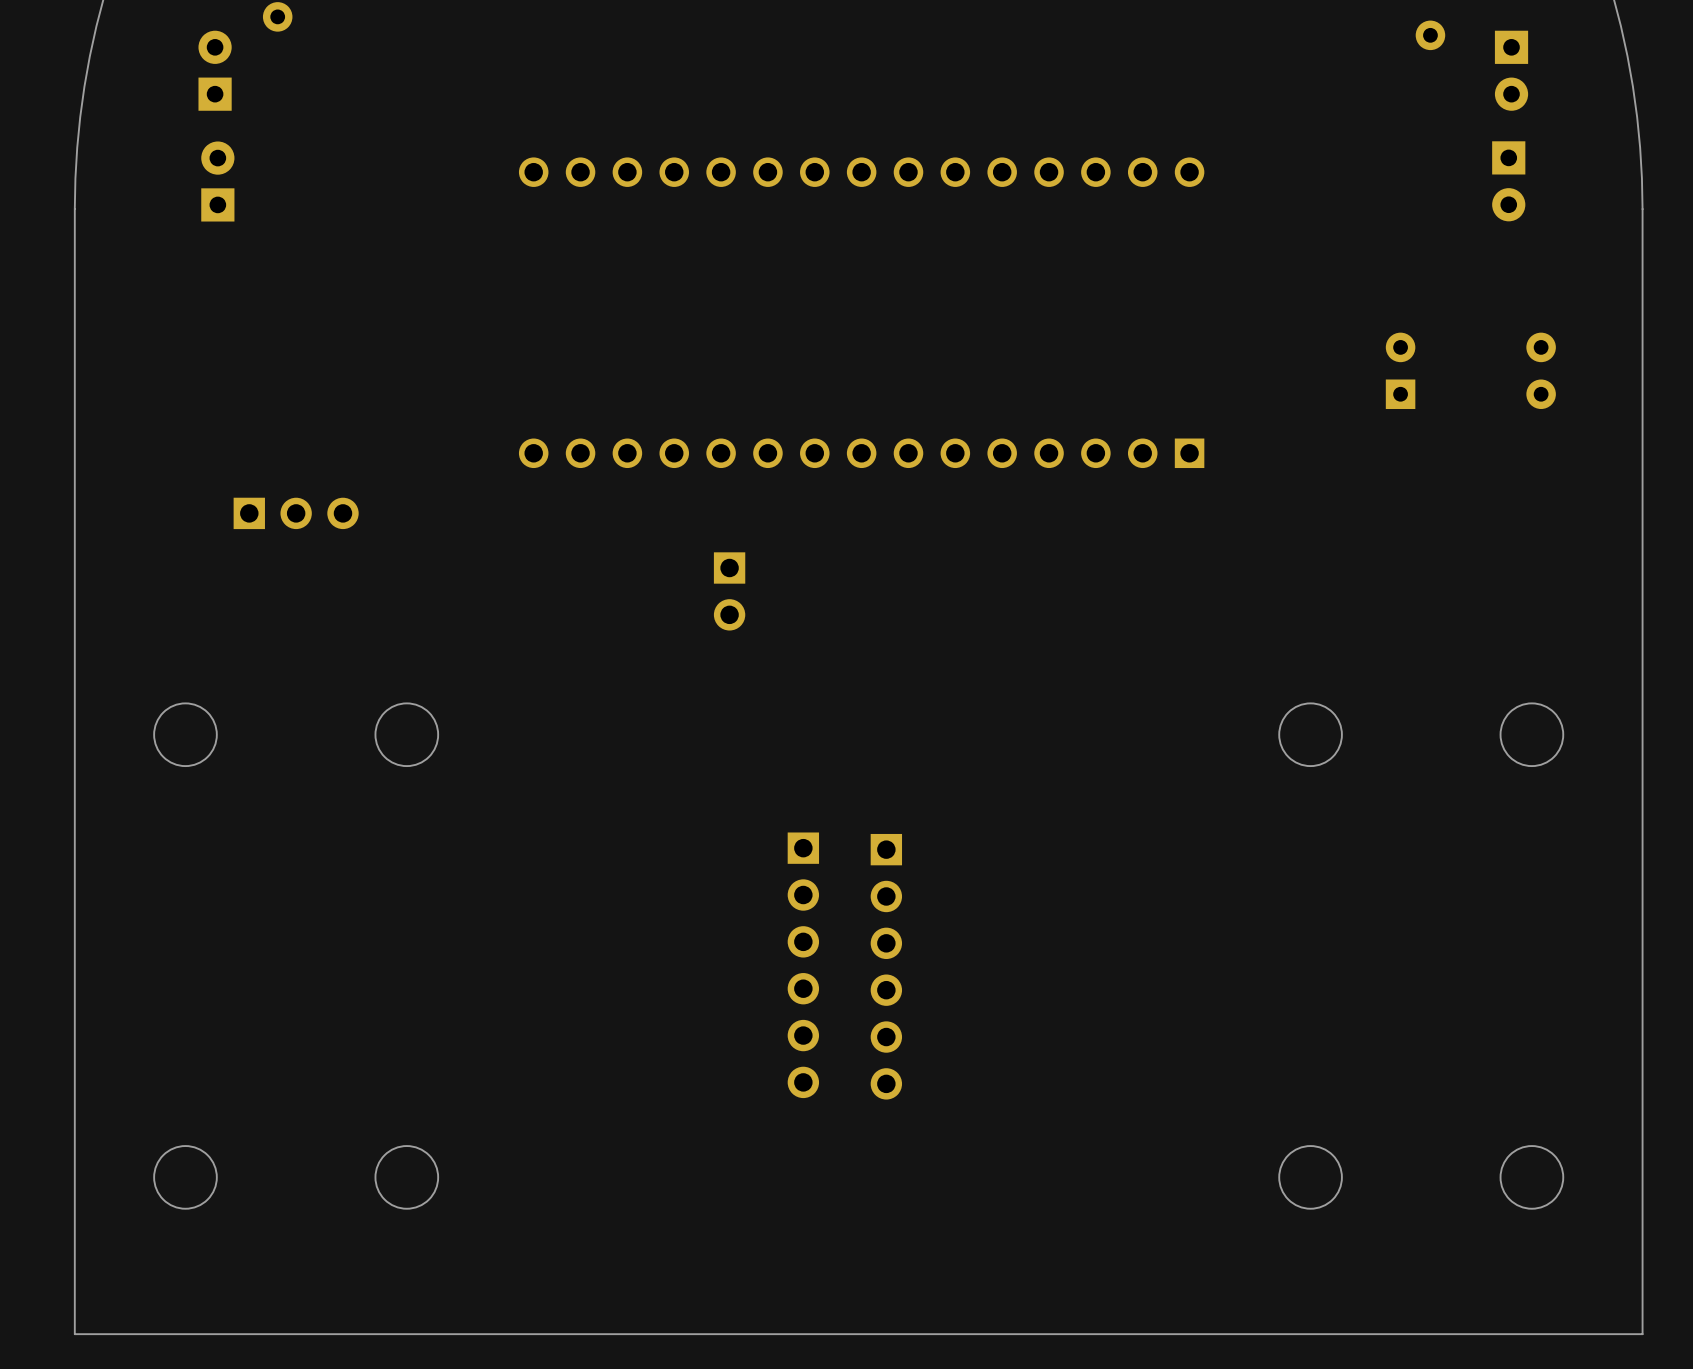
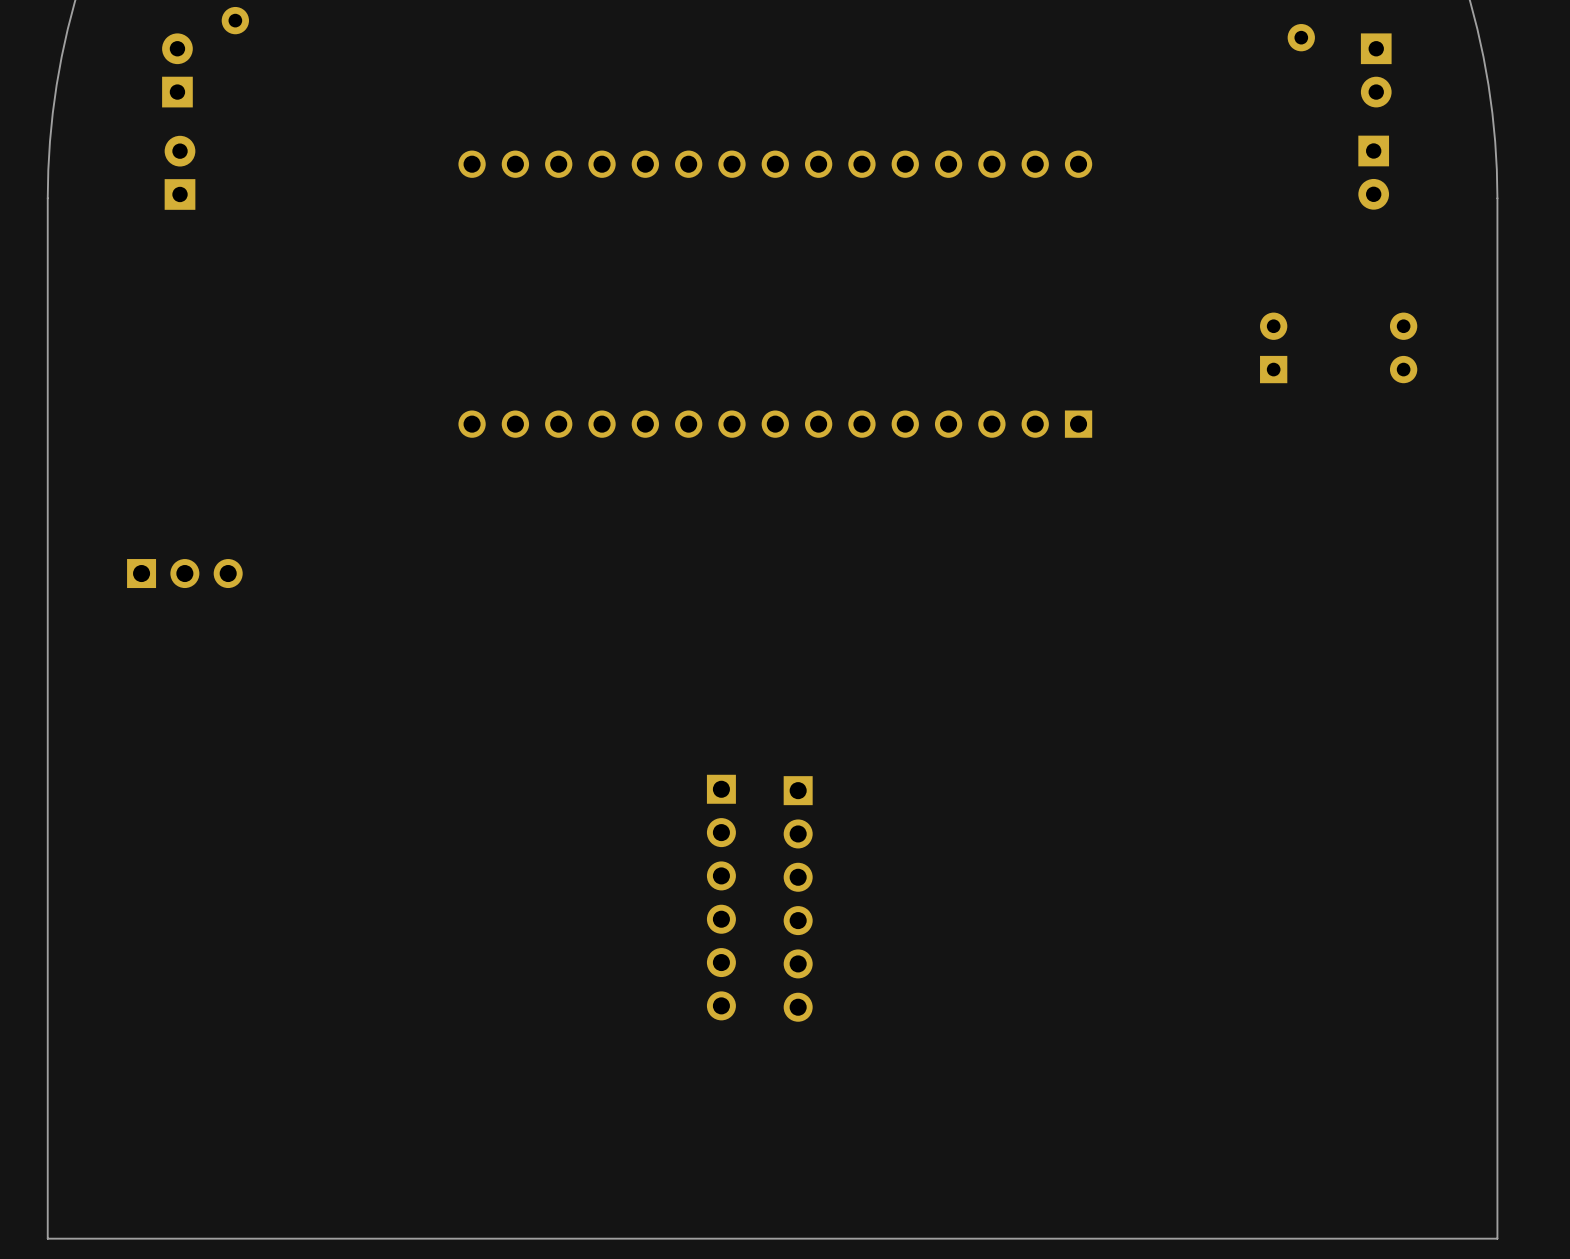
part position: (296, 513) -> (184, 573)
part: (729, 591) -> none
round board edge: [153, 702, 218, 767] -> none
round board edge: [374, 702, 439, 767] -> none
round board edge: [1278, 702, 1343, 767] -> none
round board edge: [1500, 702, 1564, 767] -> none
round board edge: [153, 1145, 218, 1210] -> none
round board edge: [374, 1145, 439, 1210] -> none
round board edge: [1278, 1145, 1343, 1210] -> none
round board edge: [1500, 1145, 1564, 1210] -> none

